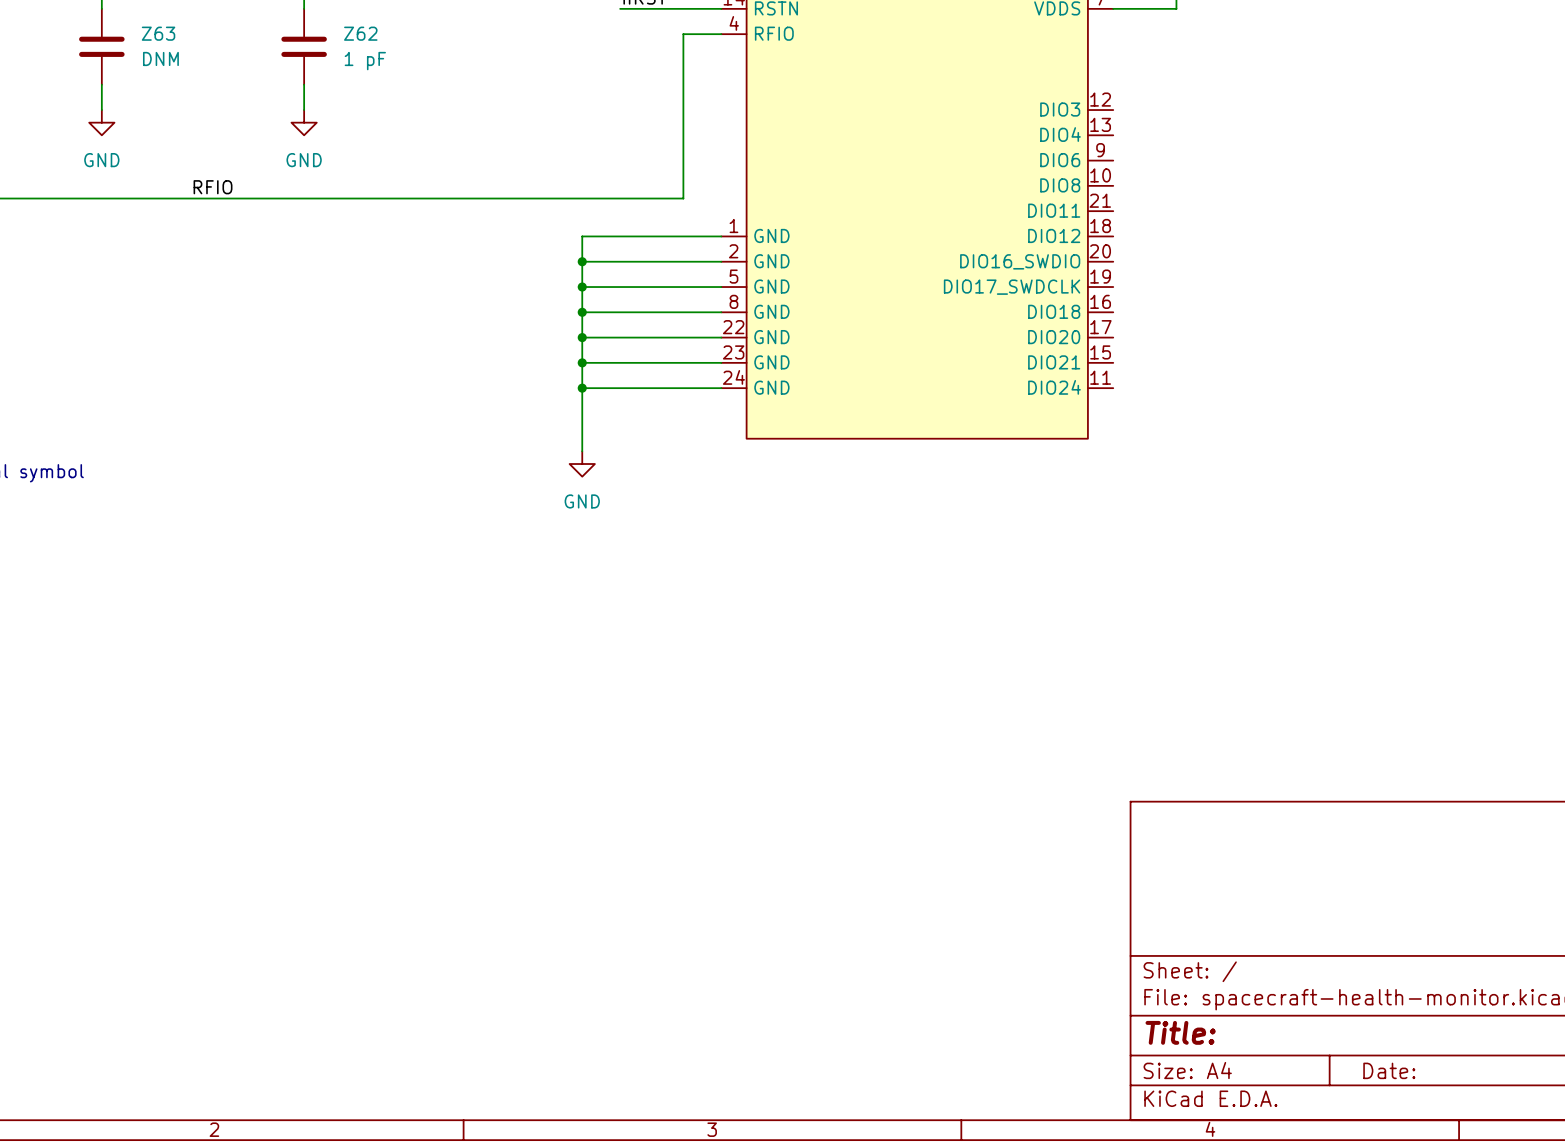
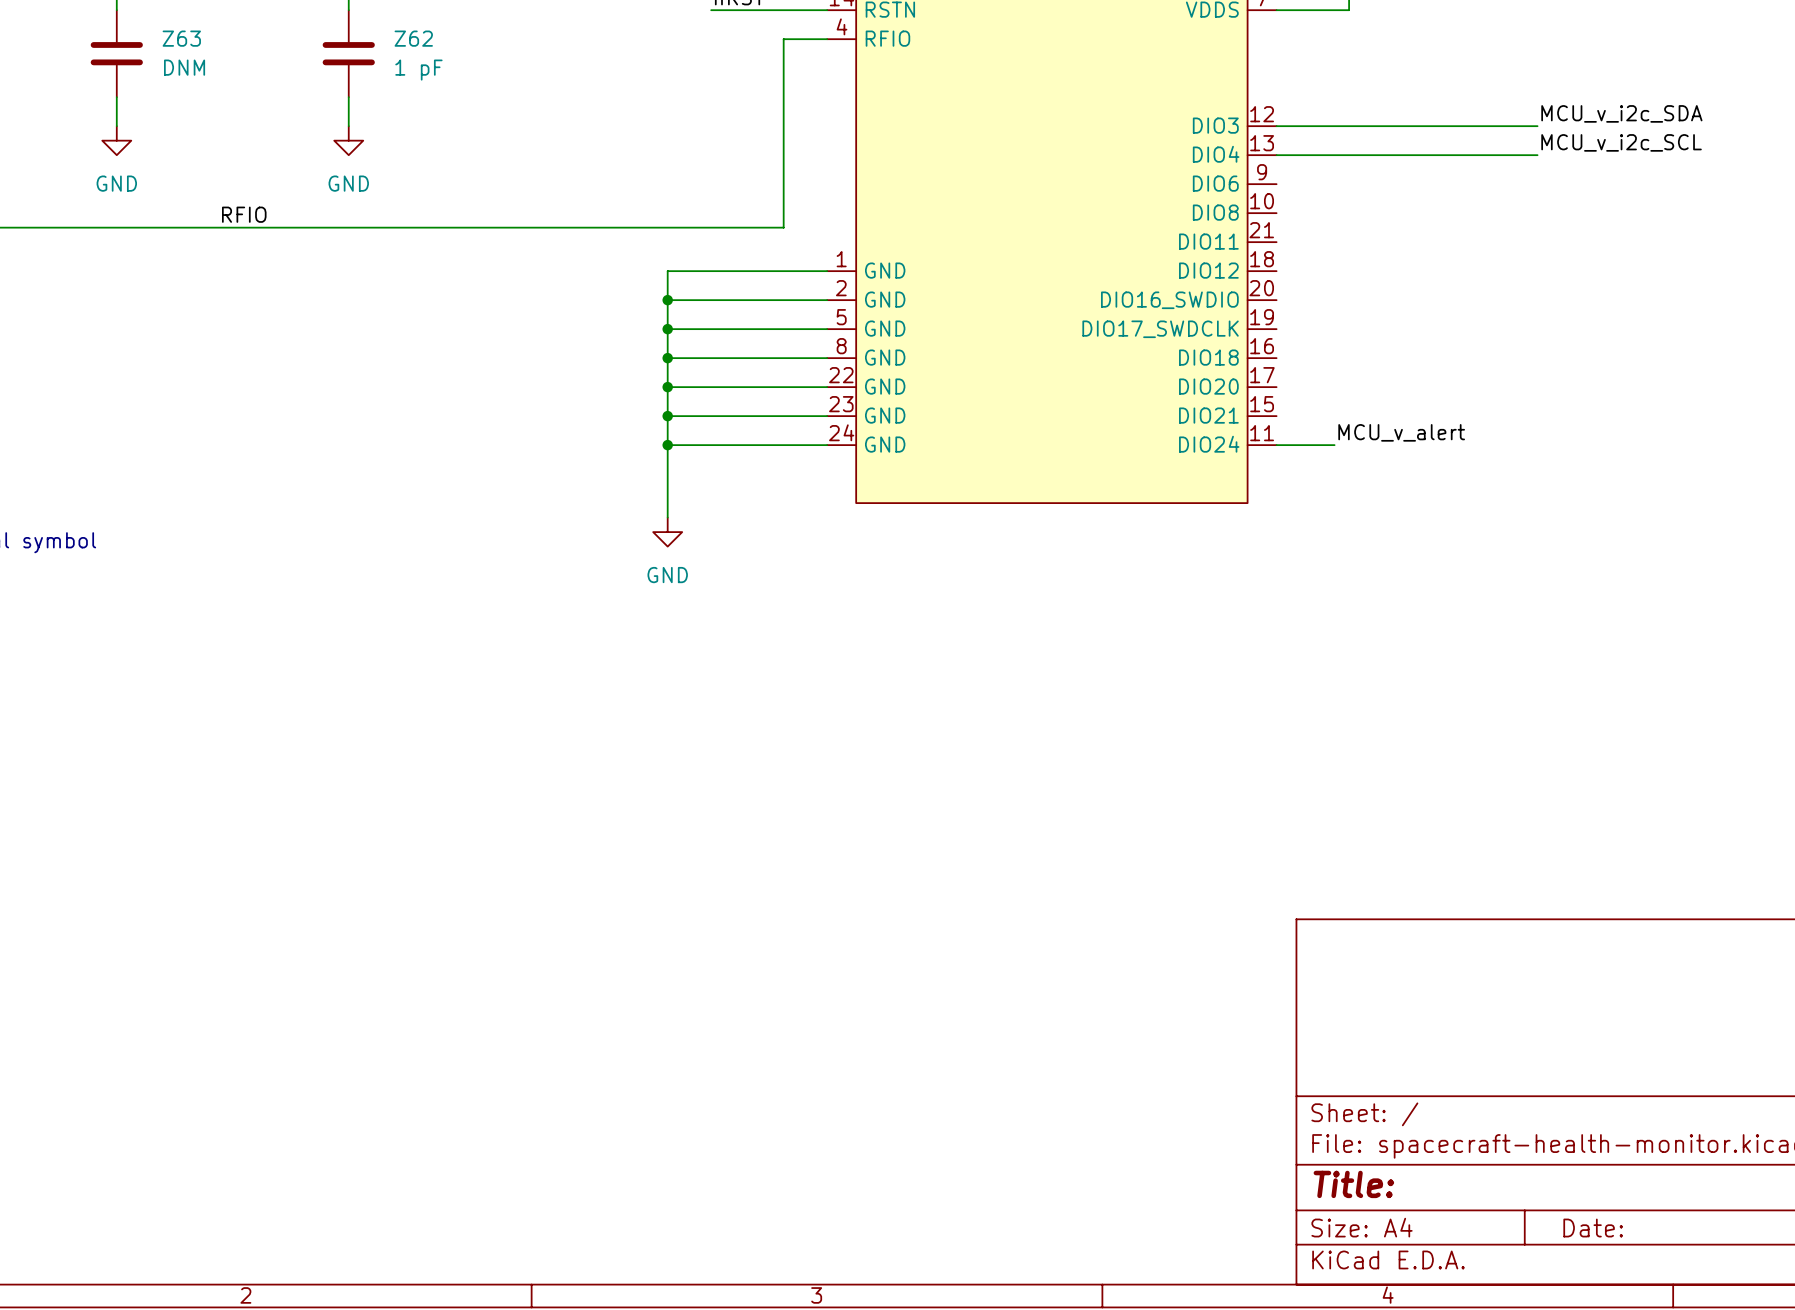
label: none -> MCU_v_i2c_SDA (1621, 113)
wire: none -> (1276, 126) (1537, 126)
label: none -> MCU_v_i2c_SCL (1621, 142)
wire: none -> (1276, 155) (1537, 155)
label: none -> MCU_v_alert (1401, 432)
wire: none -> (1276, 445) (1334, 445)

